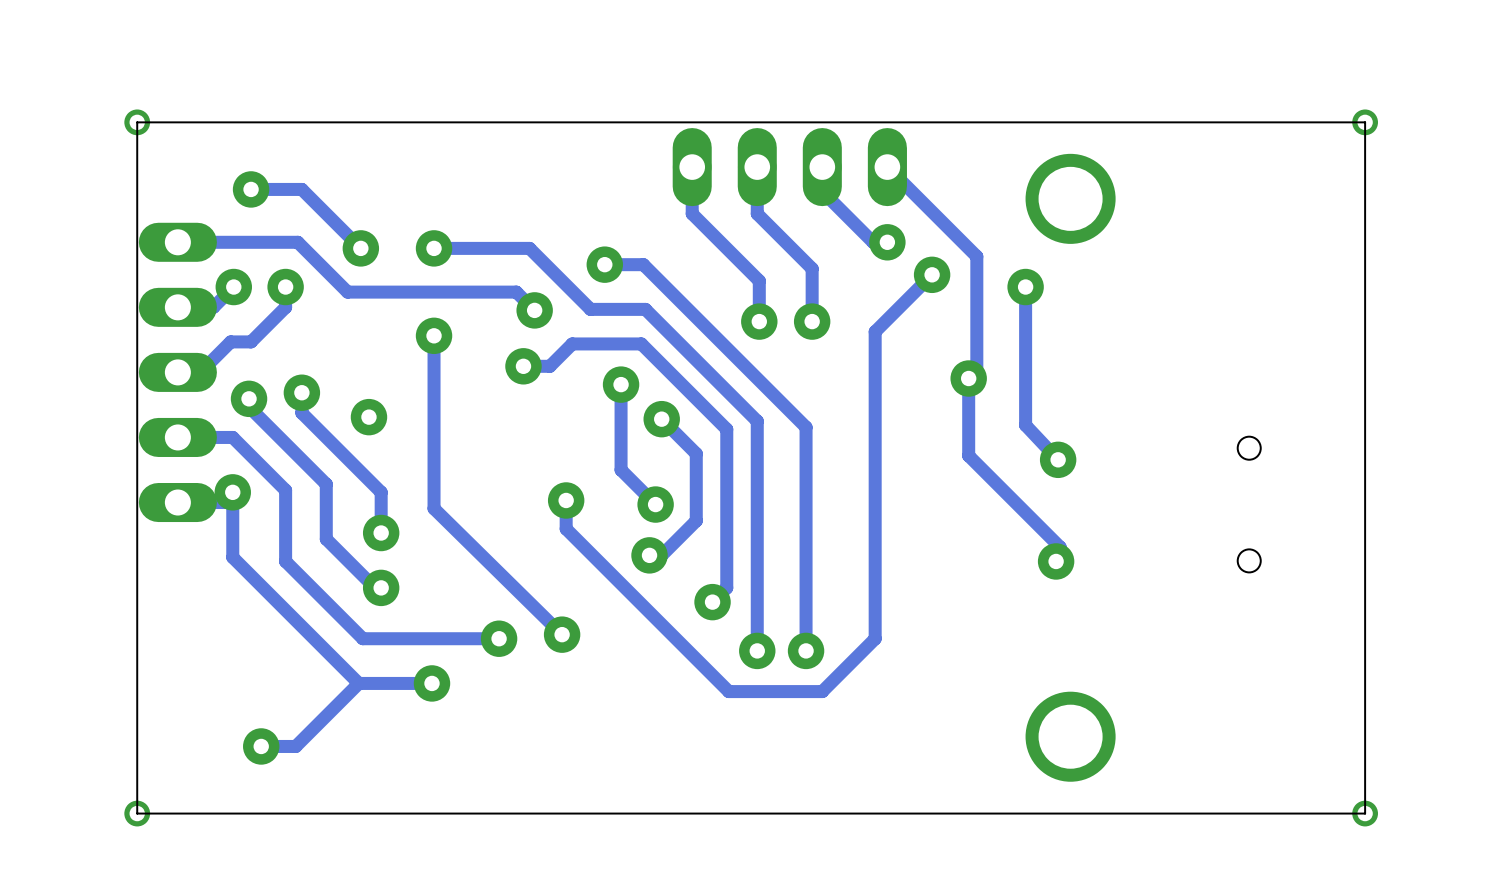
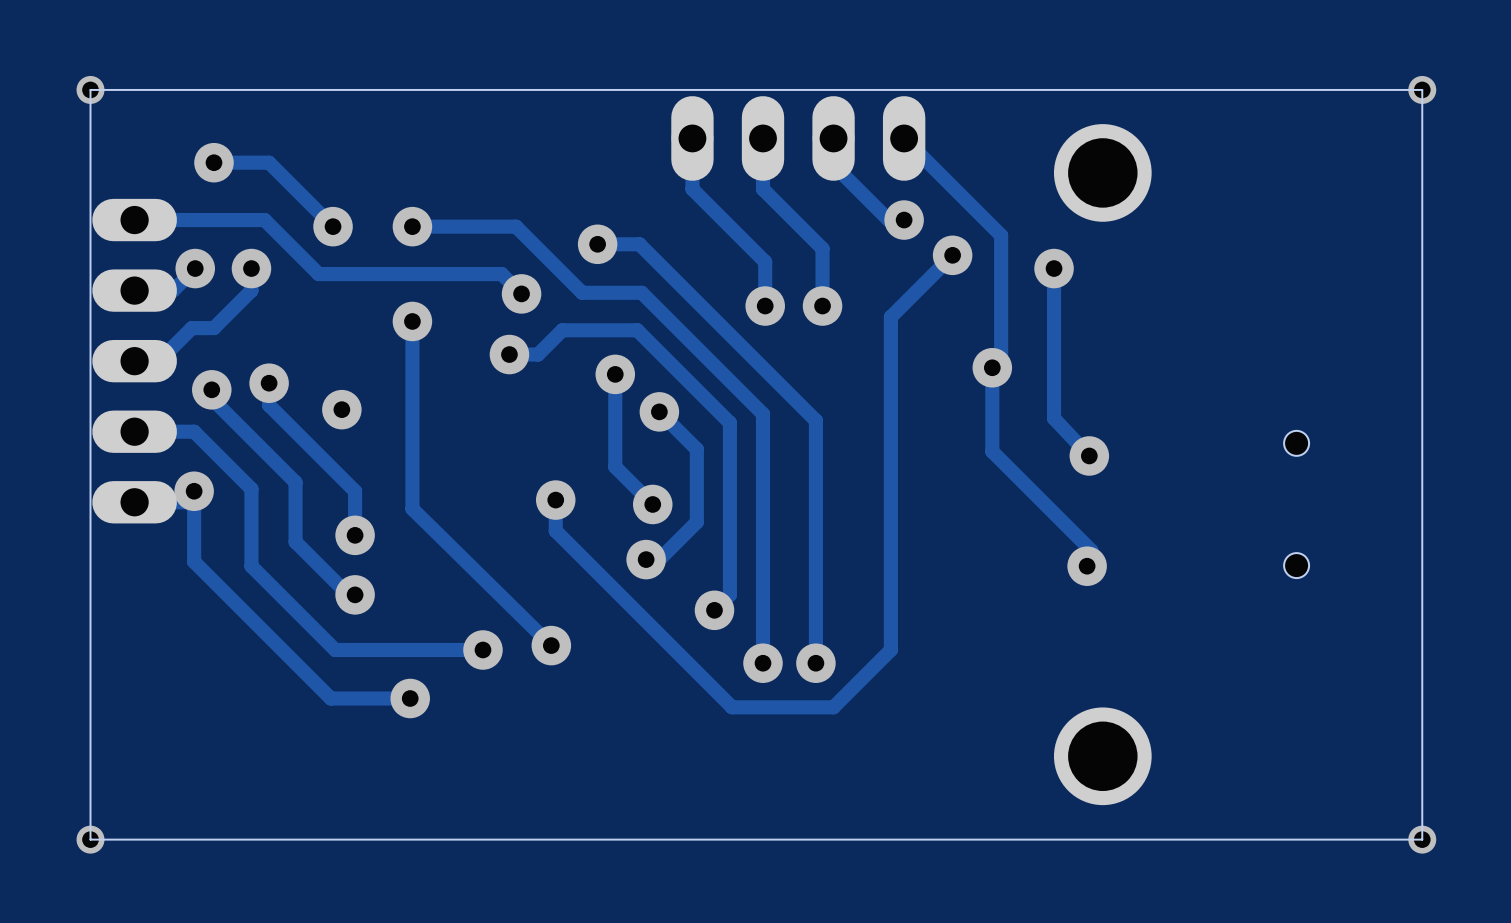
track: (358, 683) (295, 746) (261, 746) -> none
via: (261, 746) -> none

